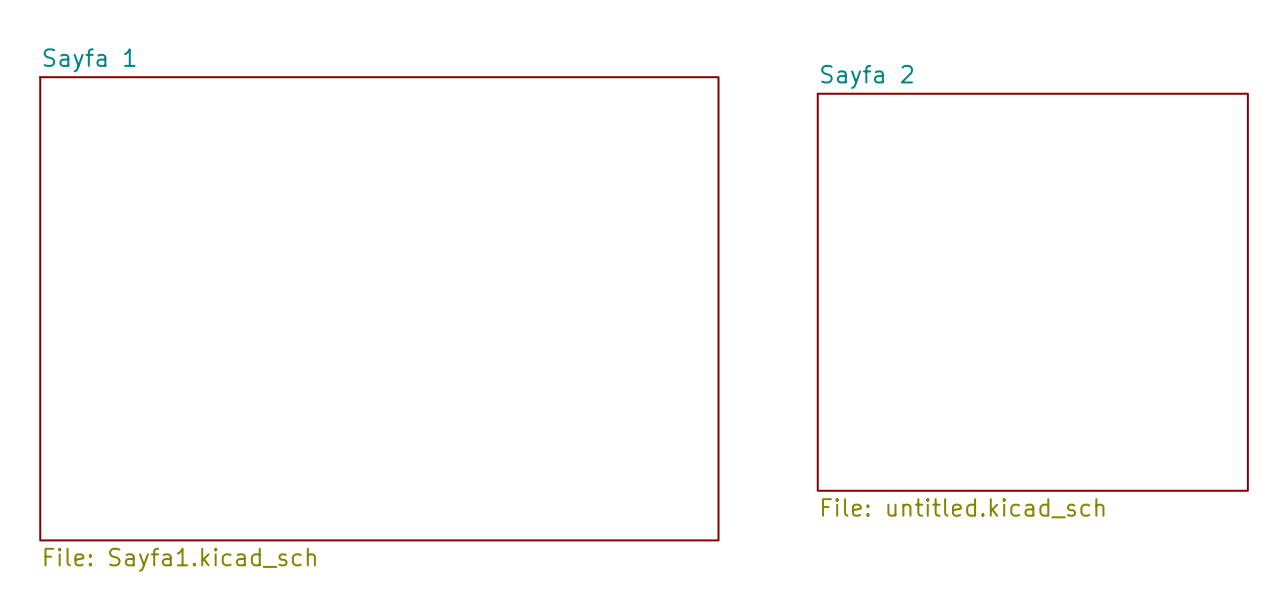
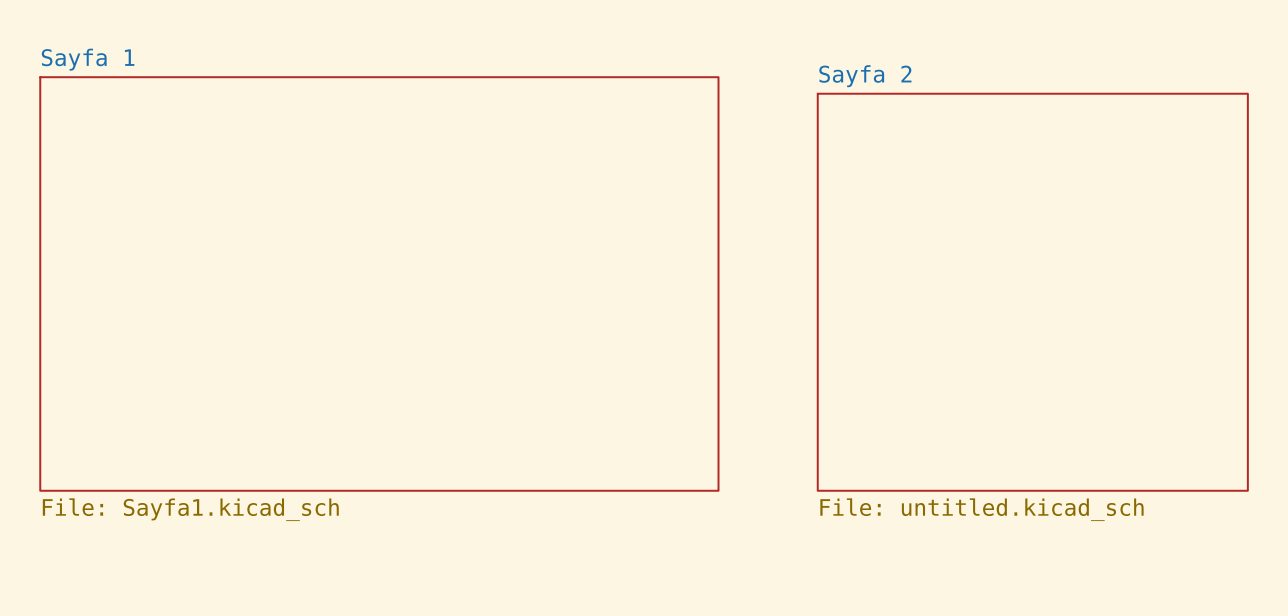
sheet Sayfa 1 shape: [39, 76, 720, 542] -> [39, 76, 720, 492]

